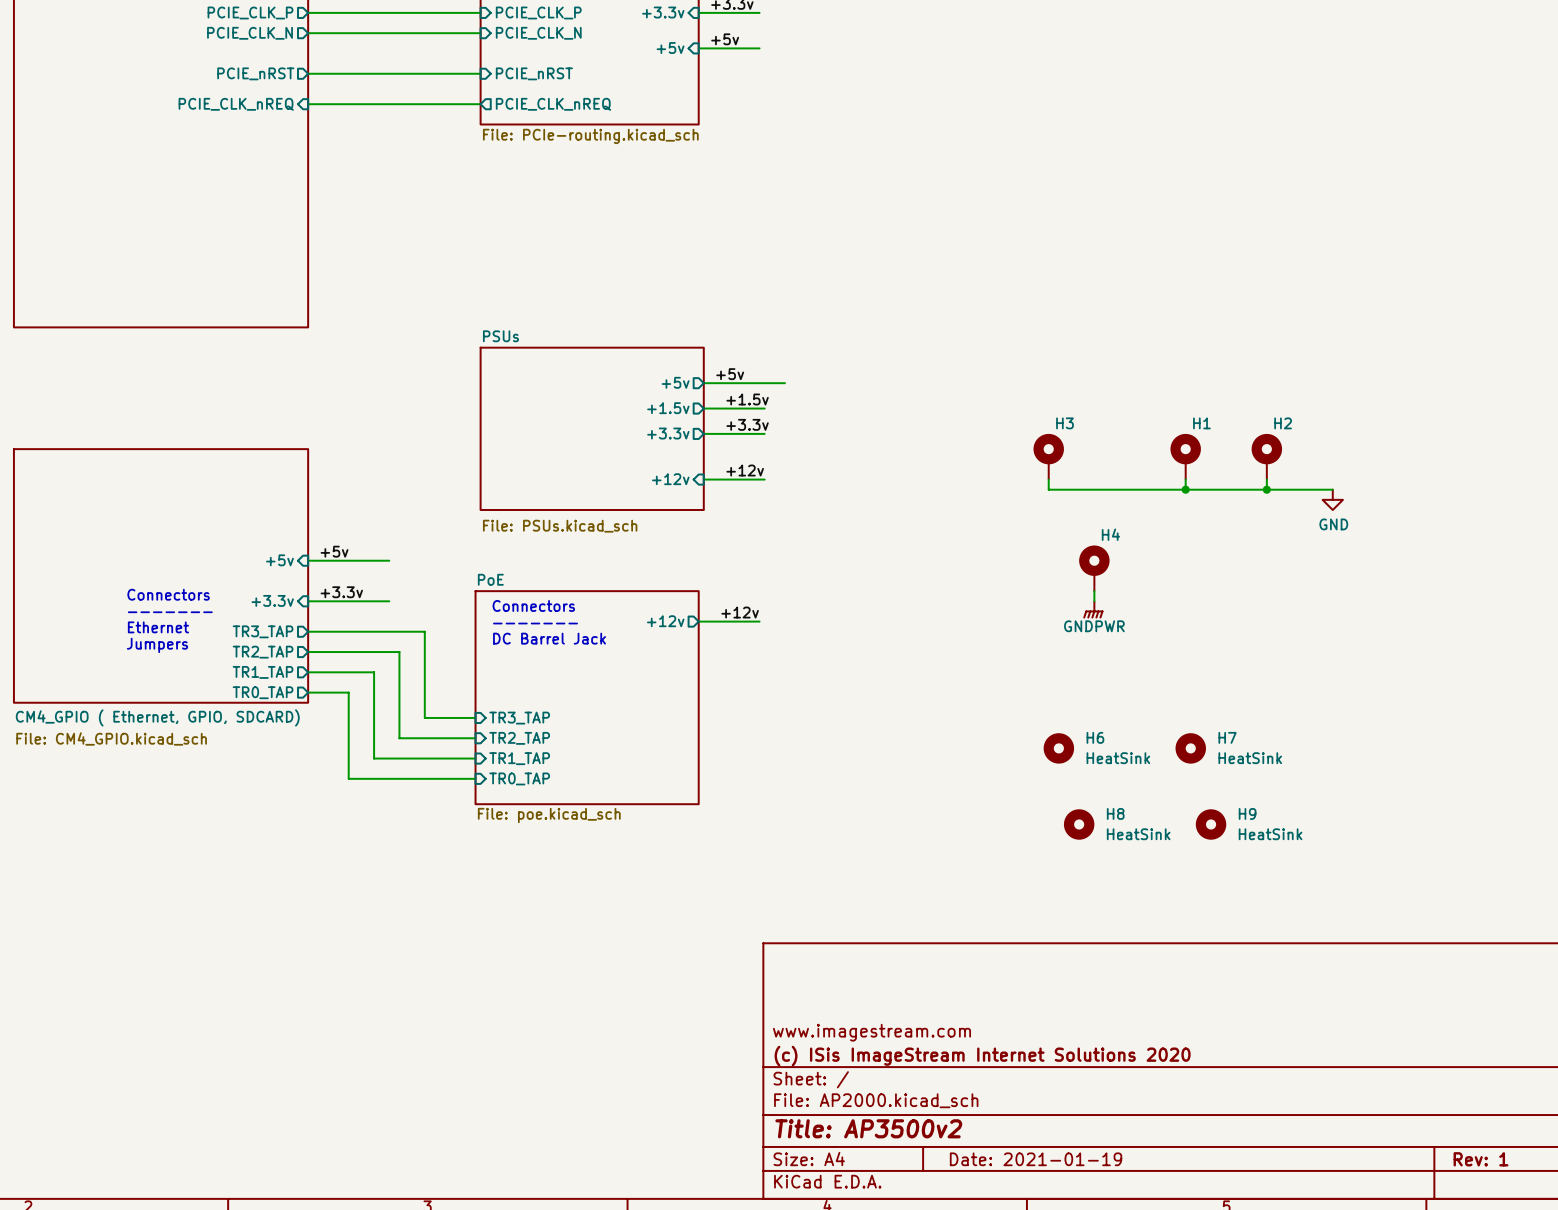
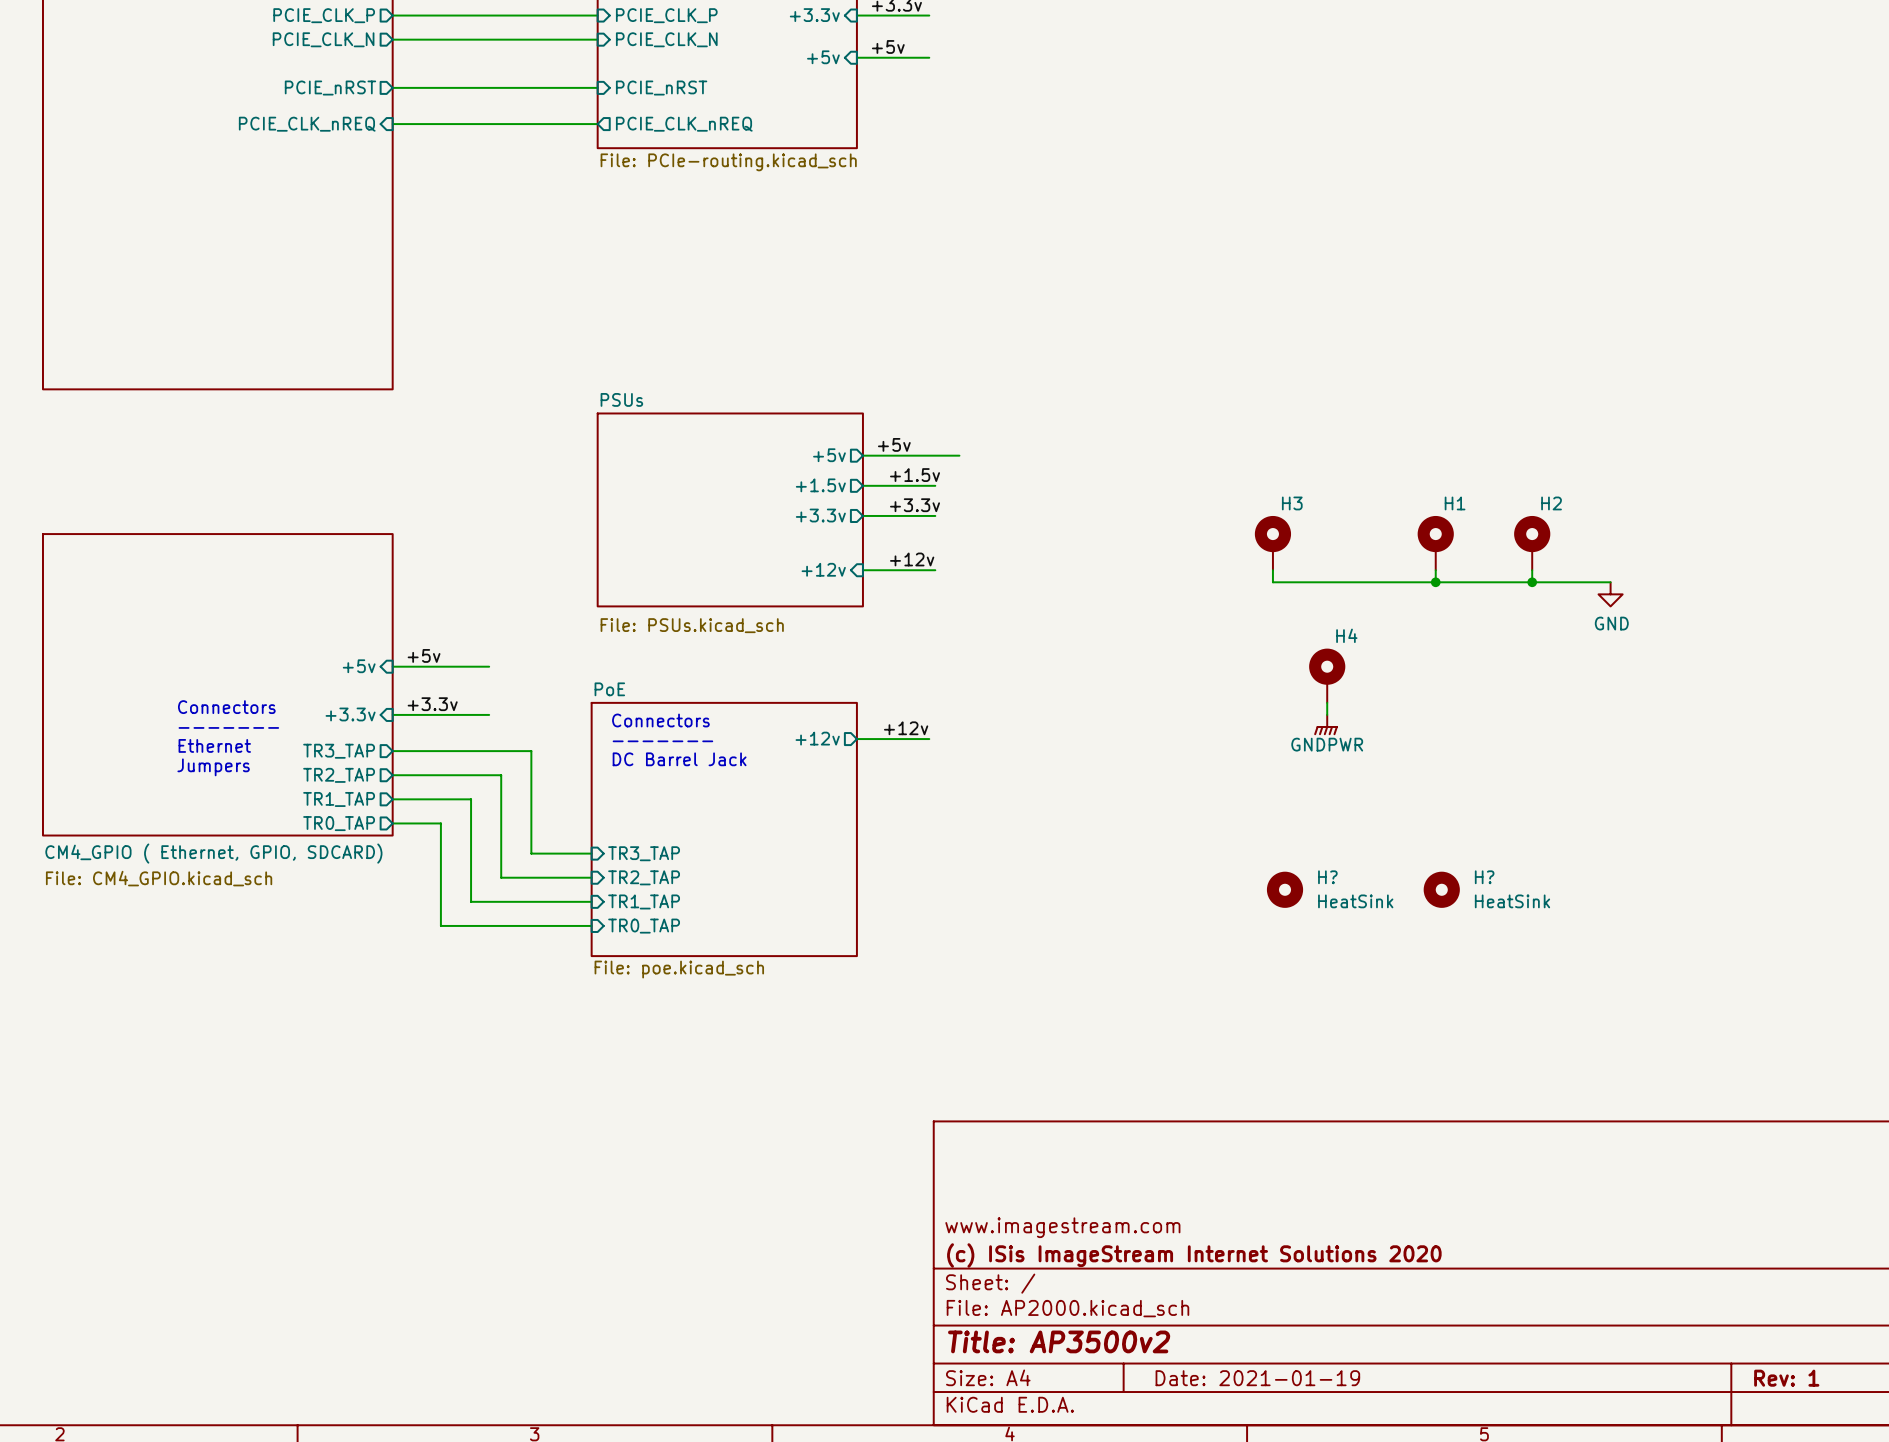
H6 name: H6 (1095, 737) -> H? (1327, 877)
H7 name: H7 (1227, 737) -> H? (1484, 877)
H8: HeatSink (1079, 824) -> none
H9: HeatSink (1211, 824) -> none

